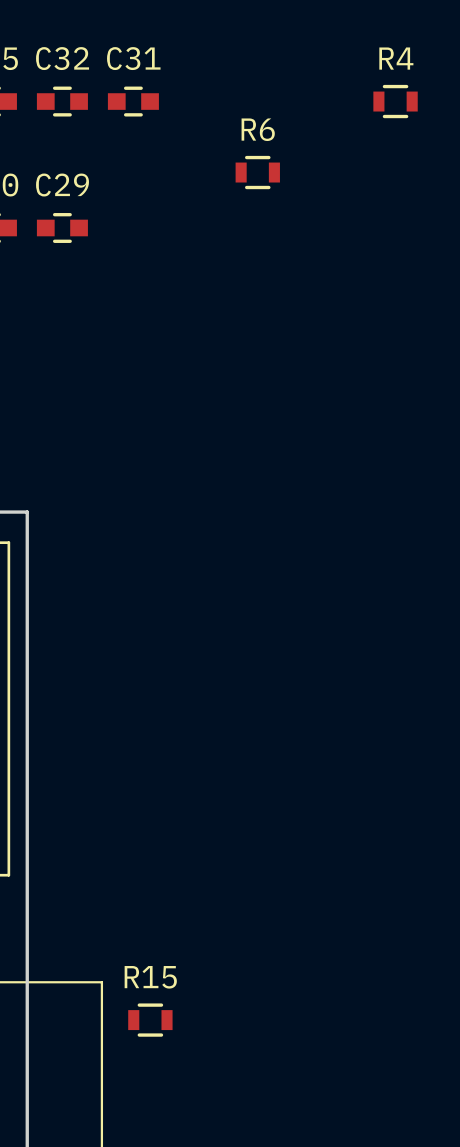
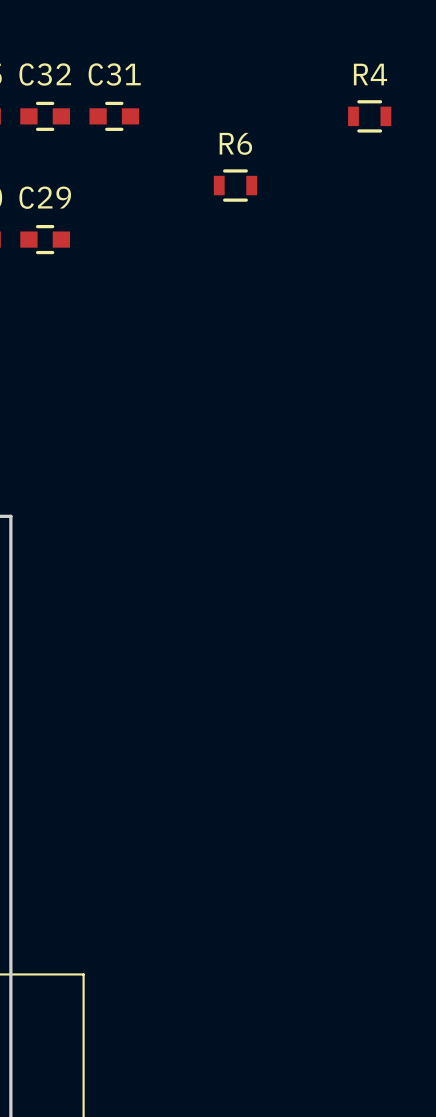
R15: (150, 1020) -> none

